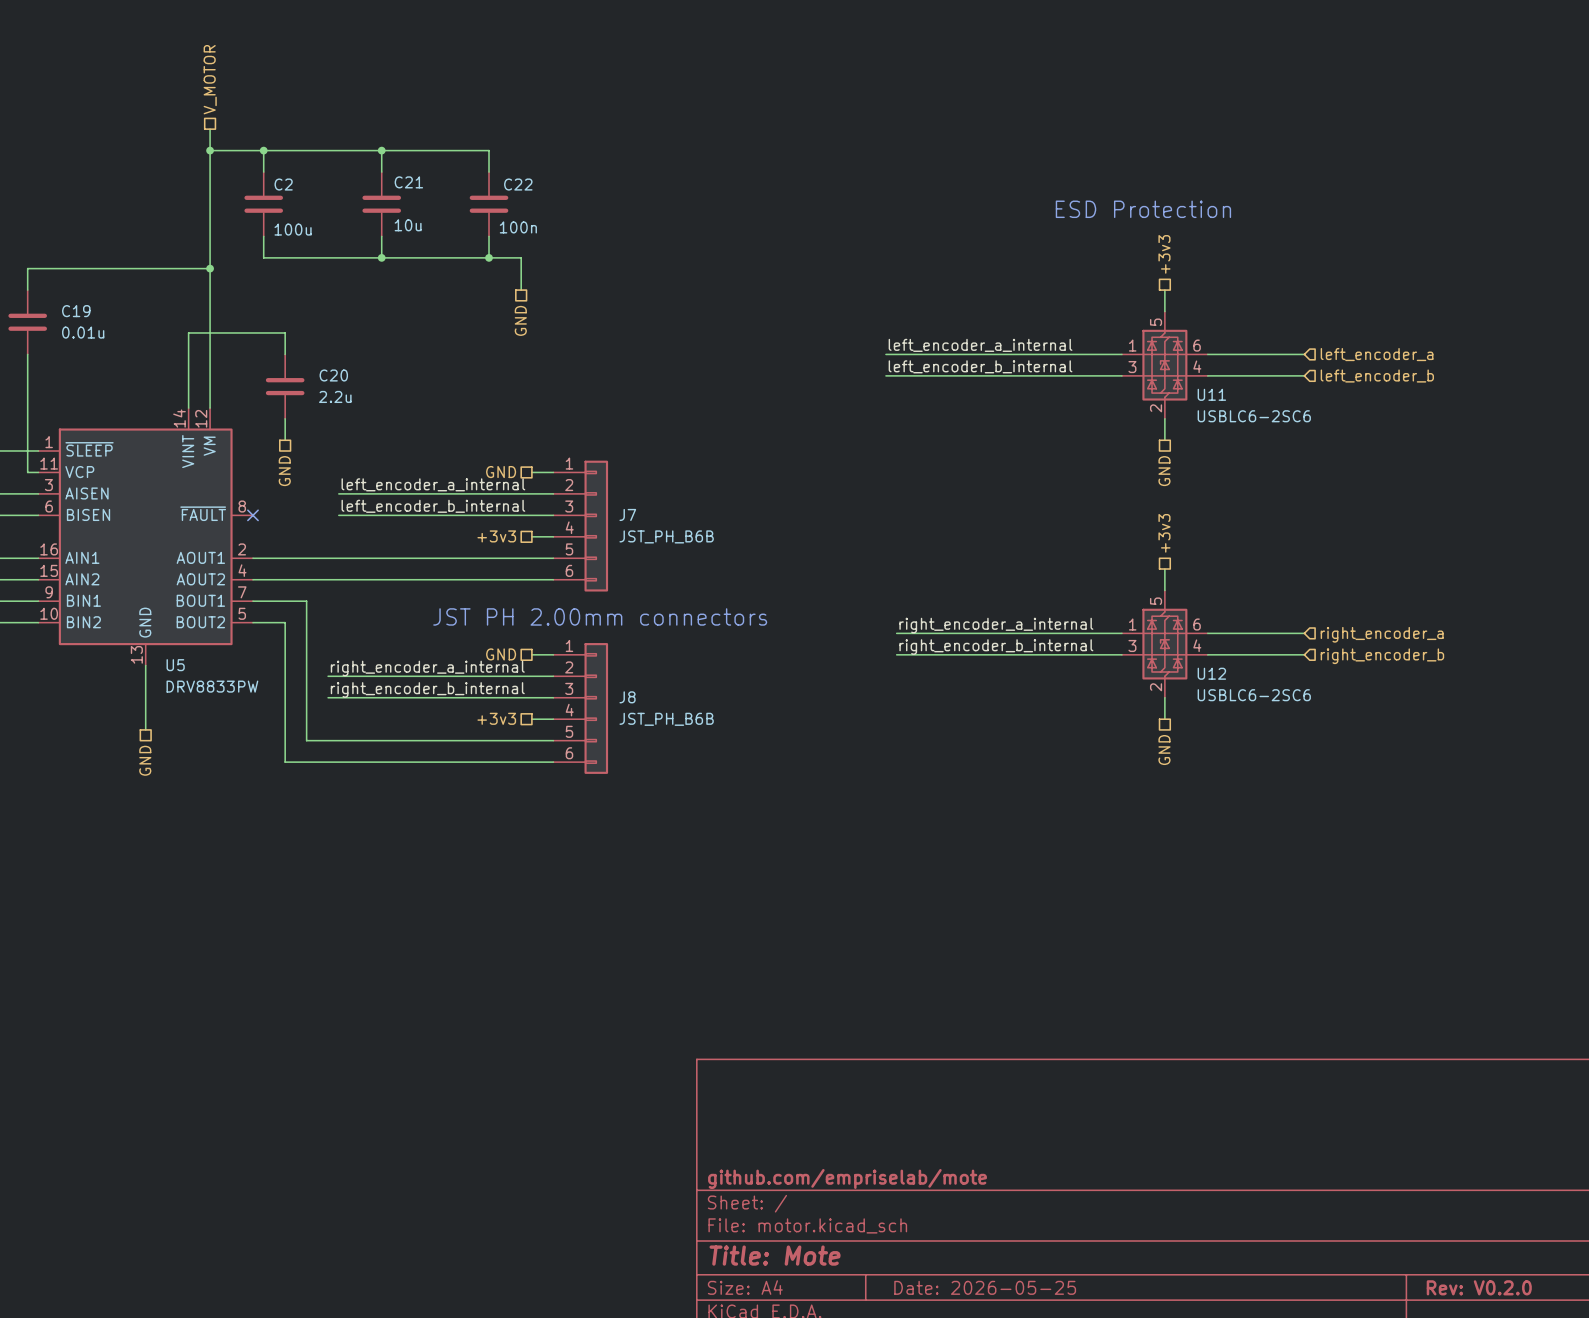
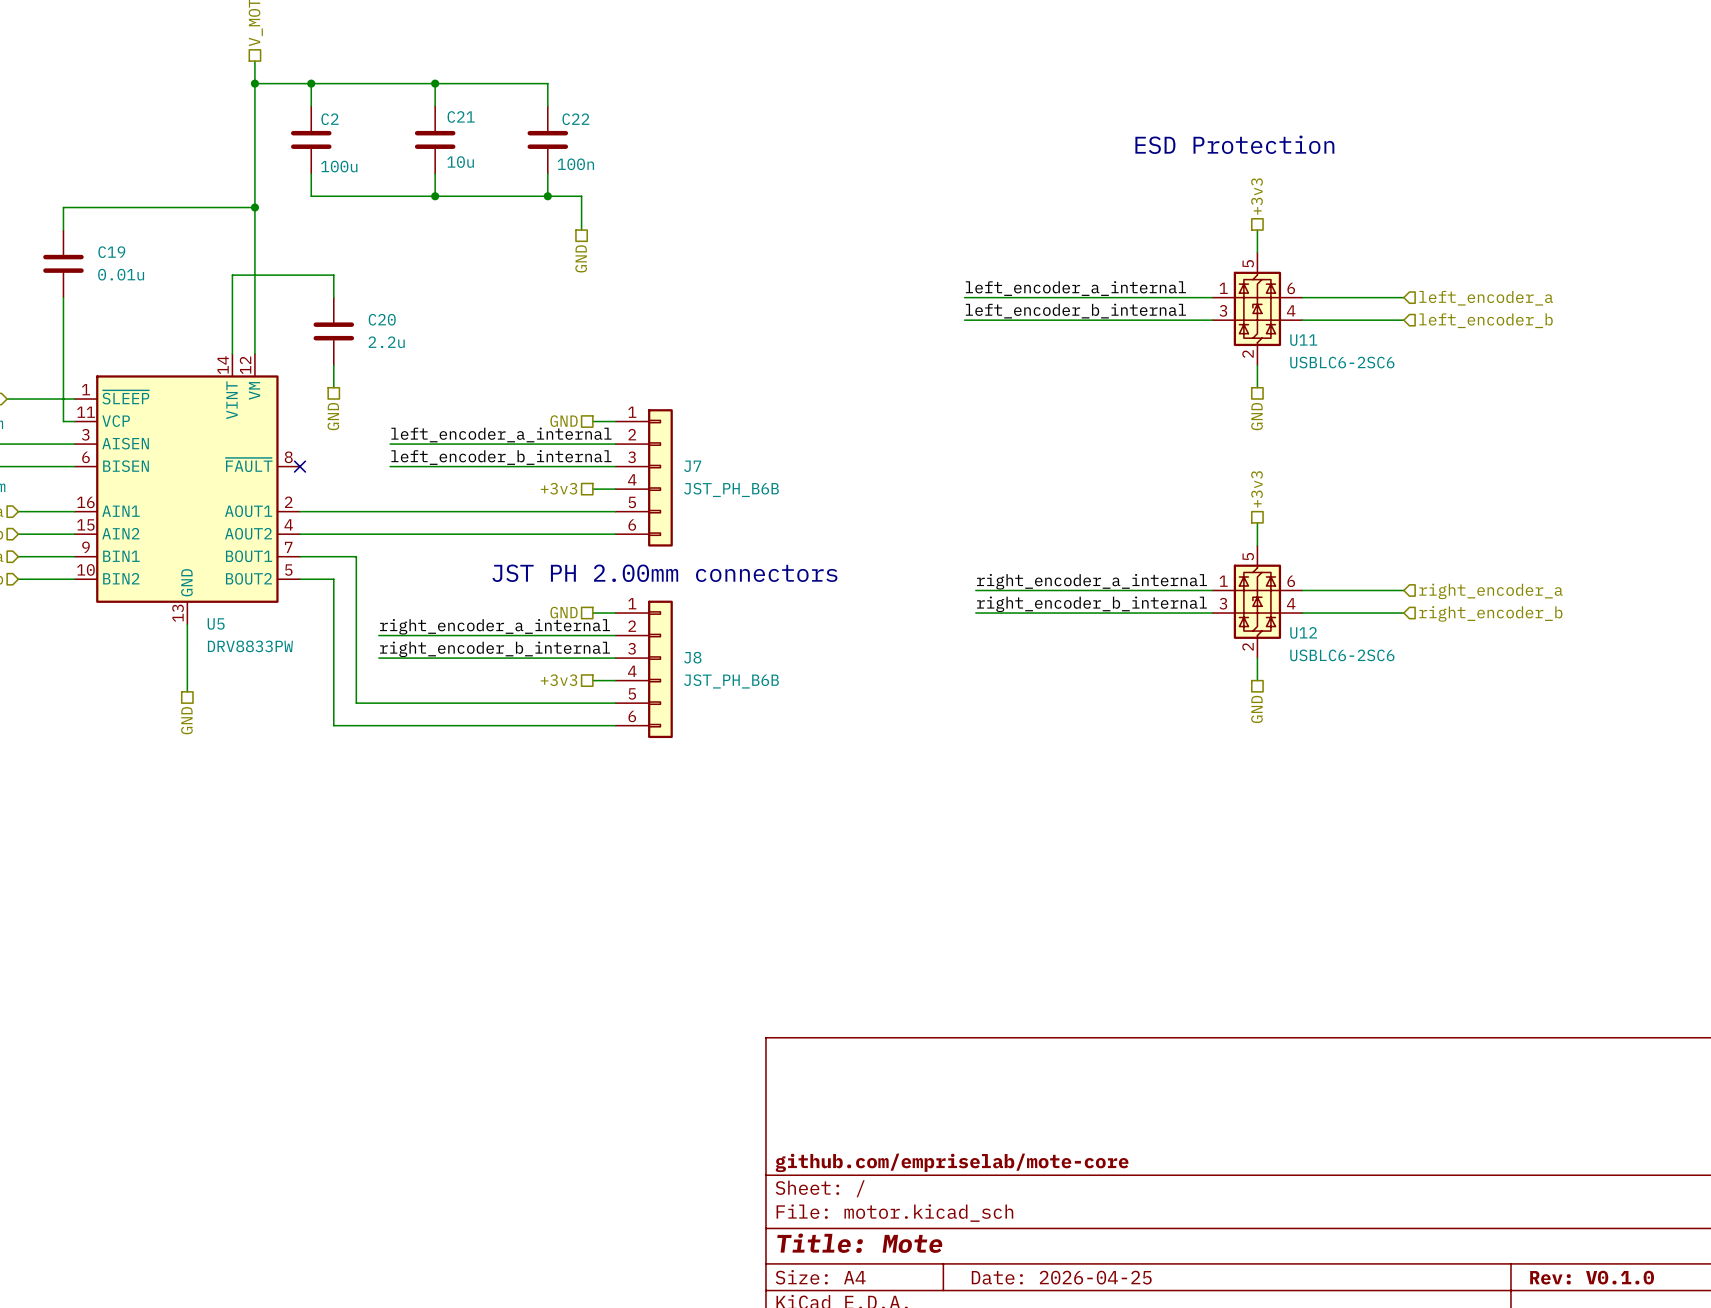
title block: github.com/empriselab/mote (847, 1178) -> github.com/empriselab/mote-core (952, 1162)
title block: Date: 2026-05-25 (985, 1287) -> Date: 2026-04-25 (1061, 1277)
title block: Rev: V0.2.0 (1479, 1287) -> Rev: V0.1.0 (1592, 1277)

